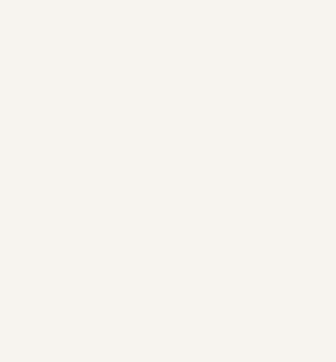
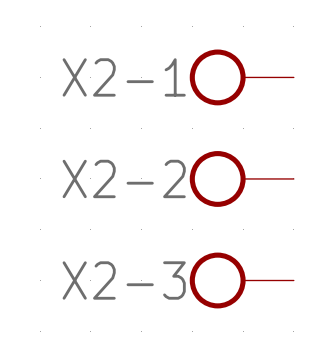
X2-1: none -> (241, 77)
X2-2: none -> (241, 178)
X2-3: none -> (241, 280)

